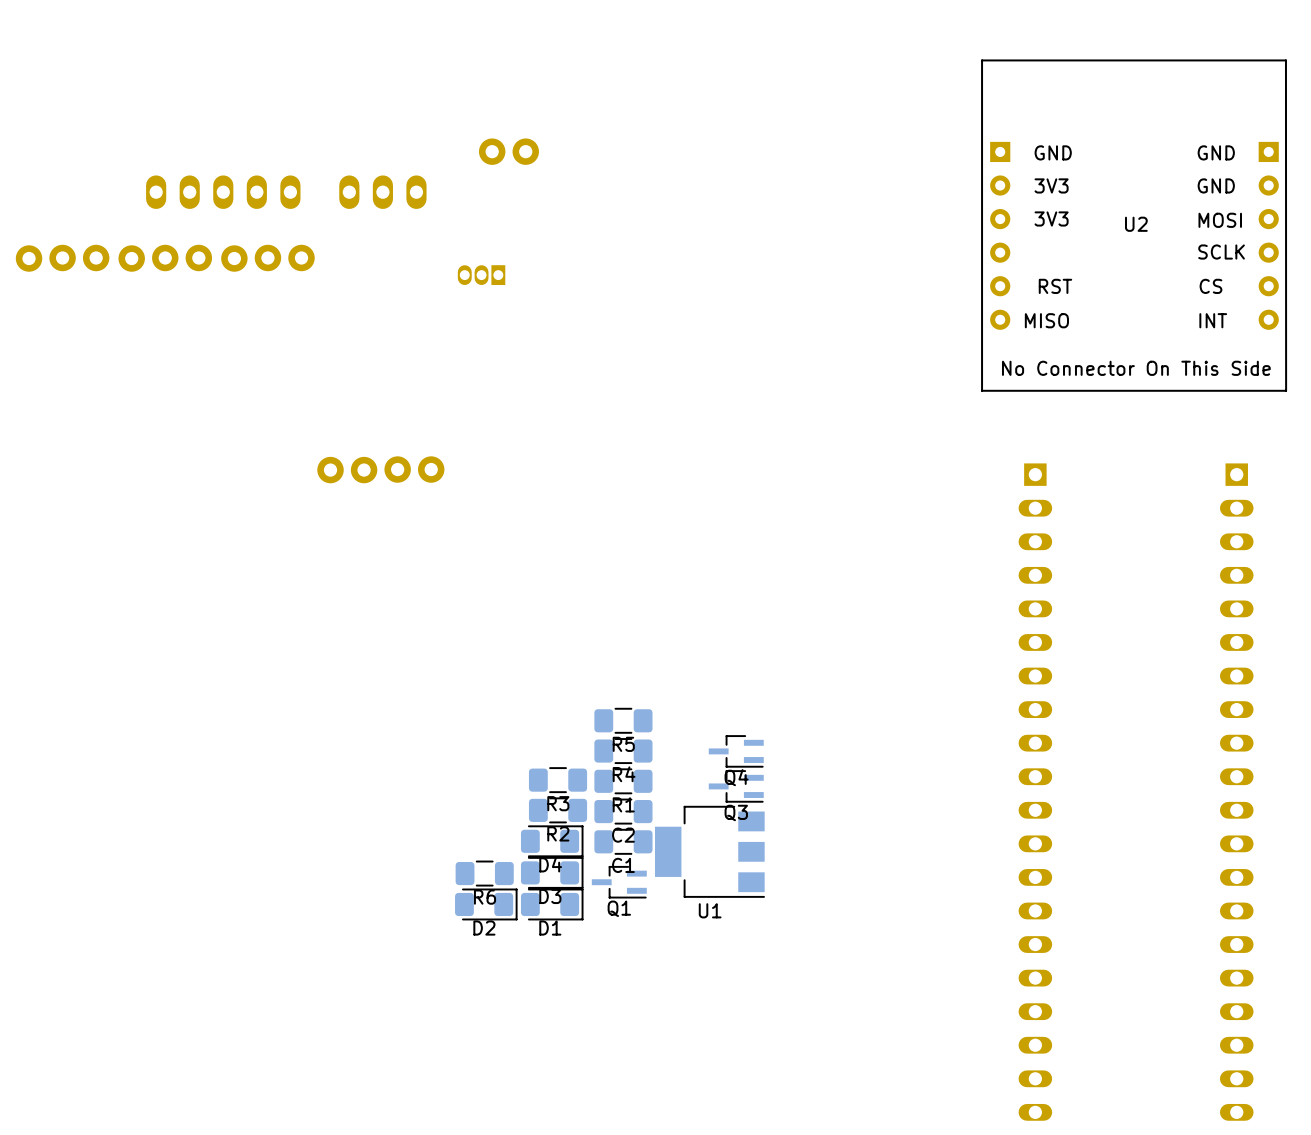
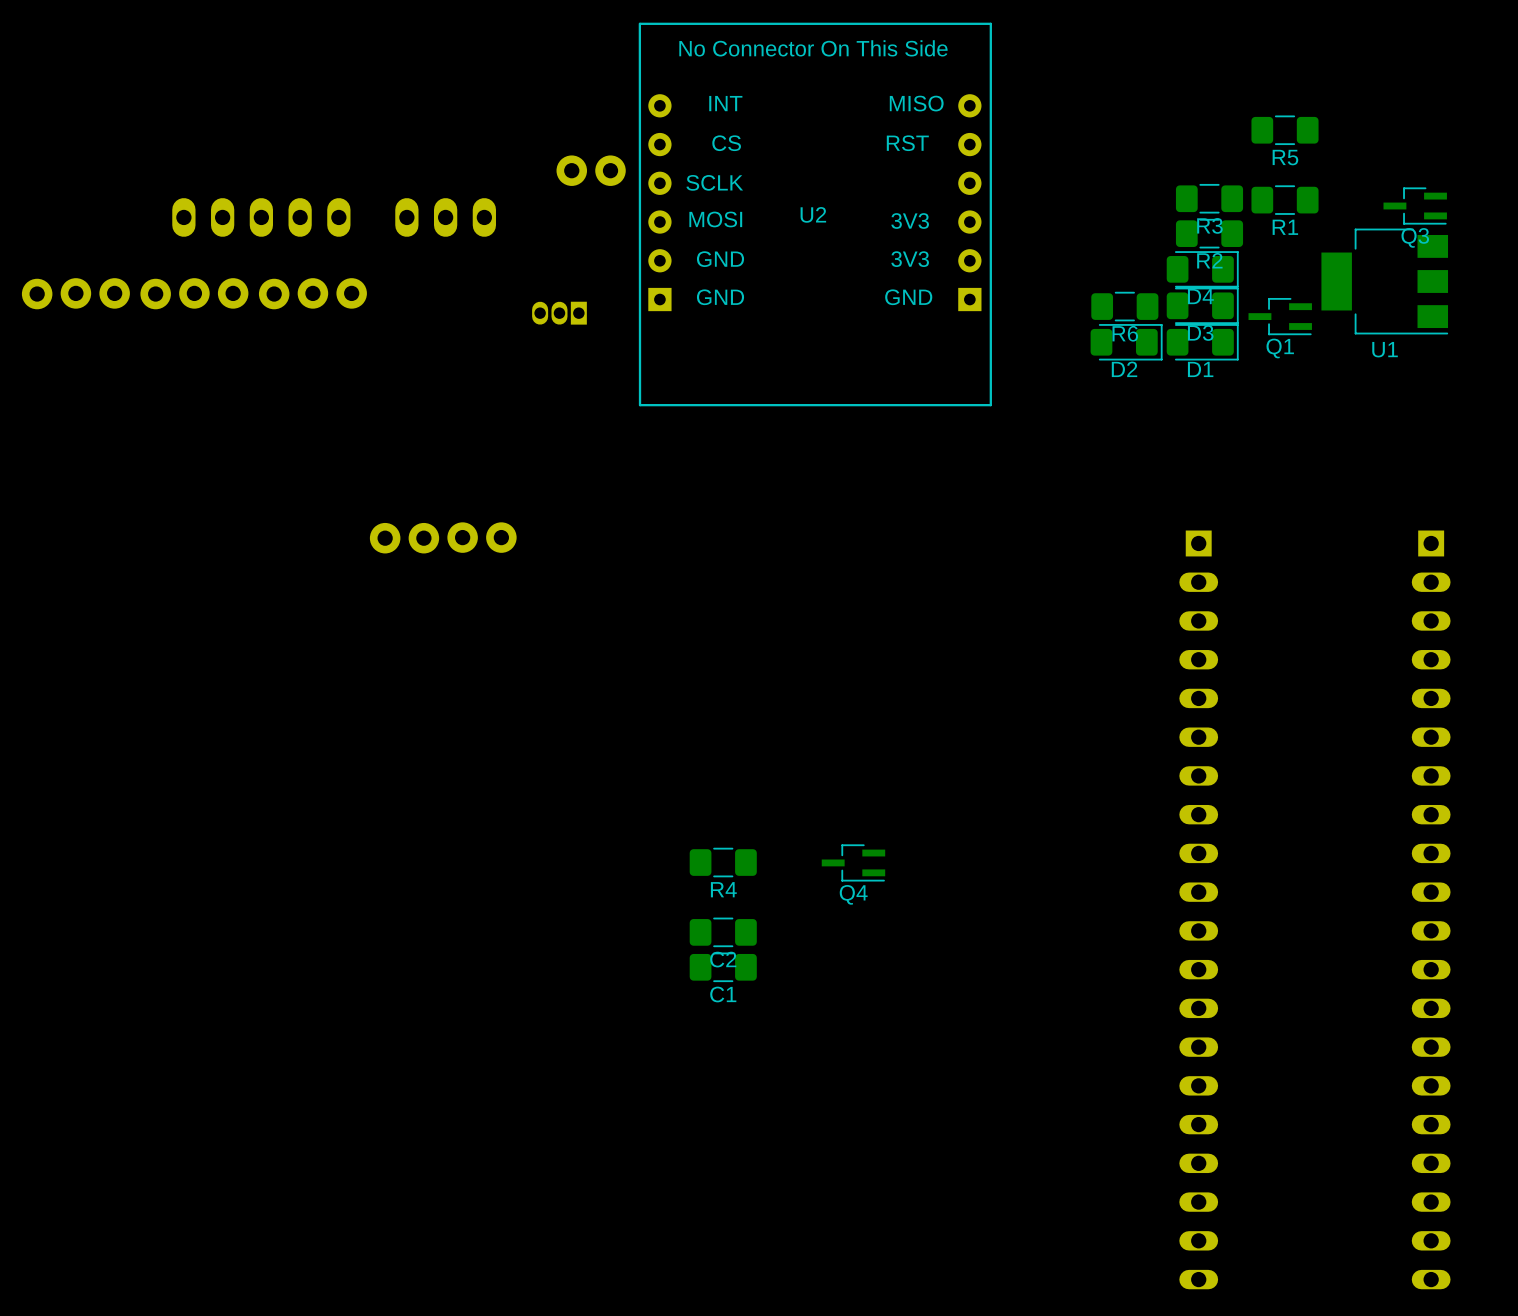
U2 rotation: 0° (1134, 225) -> 180° (815, 214)
U2 position: (1134, 225) -> (815, 214)
R5 position: (623, 720) -> (1285, 130)
R3 position: (558, 780) -> (1209, 198)
R1 position: (623, 781) -> (1285, 200)
Q3 position: (736, 786) -> (1415, 206)
R2 position: (558, 810) -> (1209, 233)
D4 position: (552, 841) -> (1202, 269)
U1 position: (709, 851) -> (1384, 281)
D3 position: (552, 872) -> (1202, 305)
R6 position: (484, 873) -> (1124, 306)
Q1 position: (619, 882) -> (1280, 316)
D2 position: (486, 904) -> (1126, 342)
D1 position: (552, 904) -> (1202, 342)

